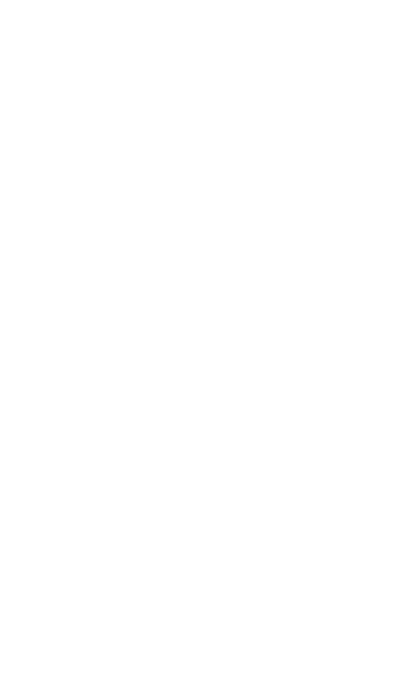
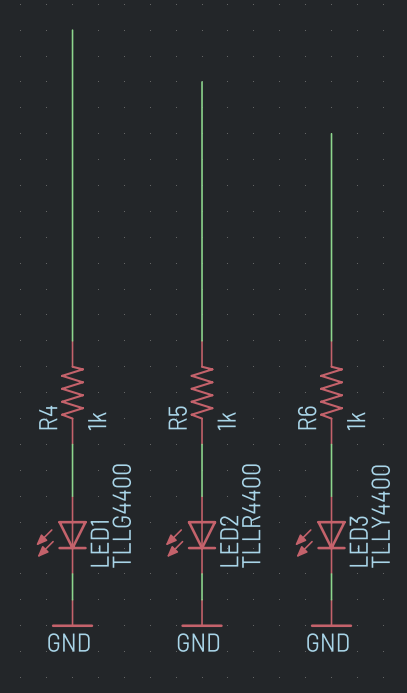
wire: none -> (72, 30) (72, 340)
wire: none -> (202, 81) (202, 340)
wire: none -> (331, 133) (331, 340)
R4: none -> 1k (72, 392)
R5: none -> 1k (202, 392)
R6: none -> 1k (331, 392)
wire: none -> (72, 444) (72, 496)
wire: none -> (202, 444) (202, 496)
wire: none -> (331, 444) (331, 496)
LED1: none -> TLLG4400 (61, 535)
LED2: none -> TLLR4400 (191, 535)
LED3: none -> TLLY4400 (320, 535)
wire: none -> (72, 573) (72, 599)
wire: none -> (202, 573) (202, 599)
wire: none -> (331, 573) (331, 599)
power symbol: none -> GND (72, 613)
power symbol: none -> GND (202, 613)
power symbol: none -> GND (331, 613)

